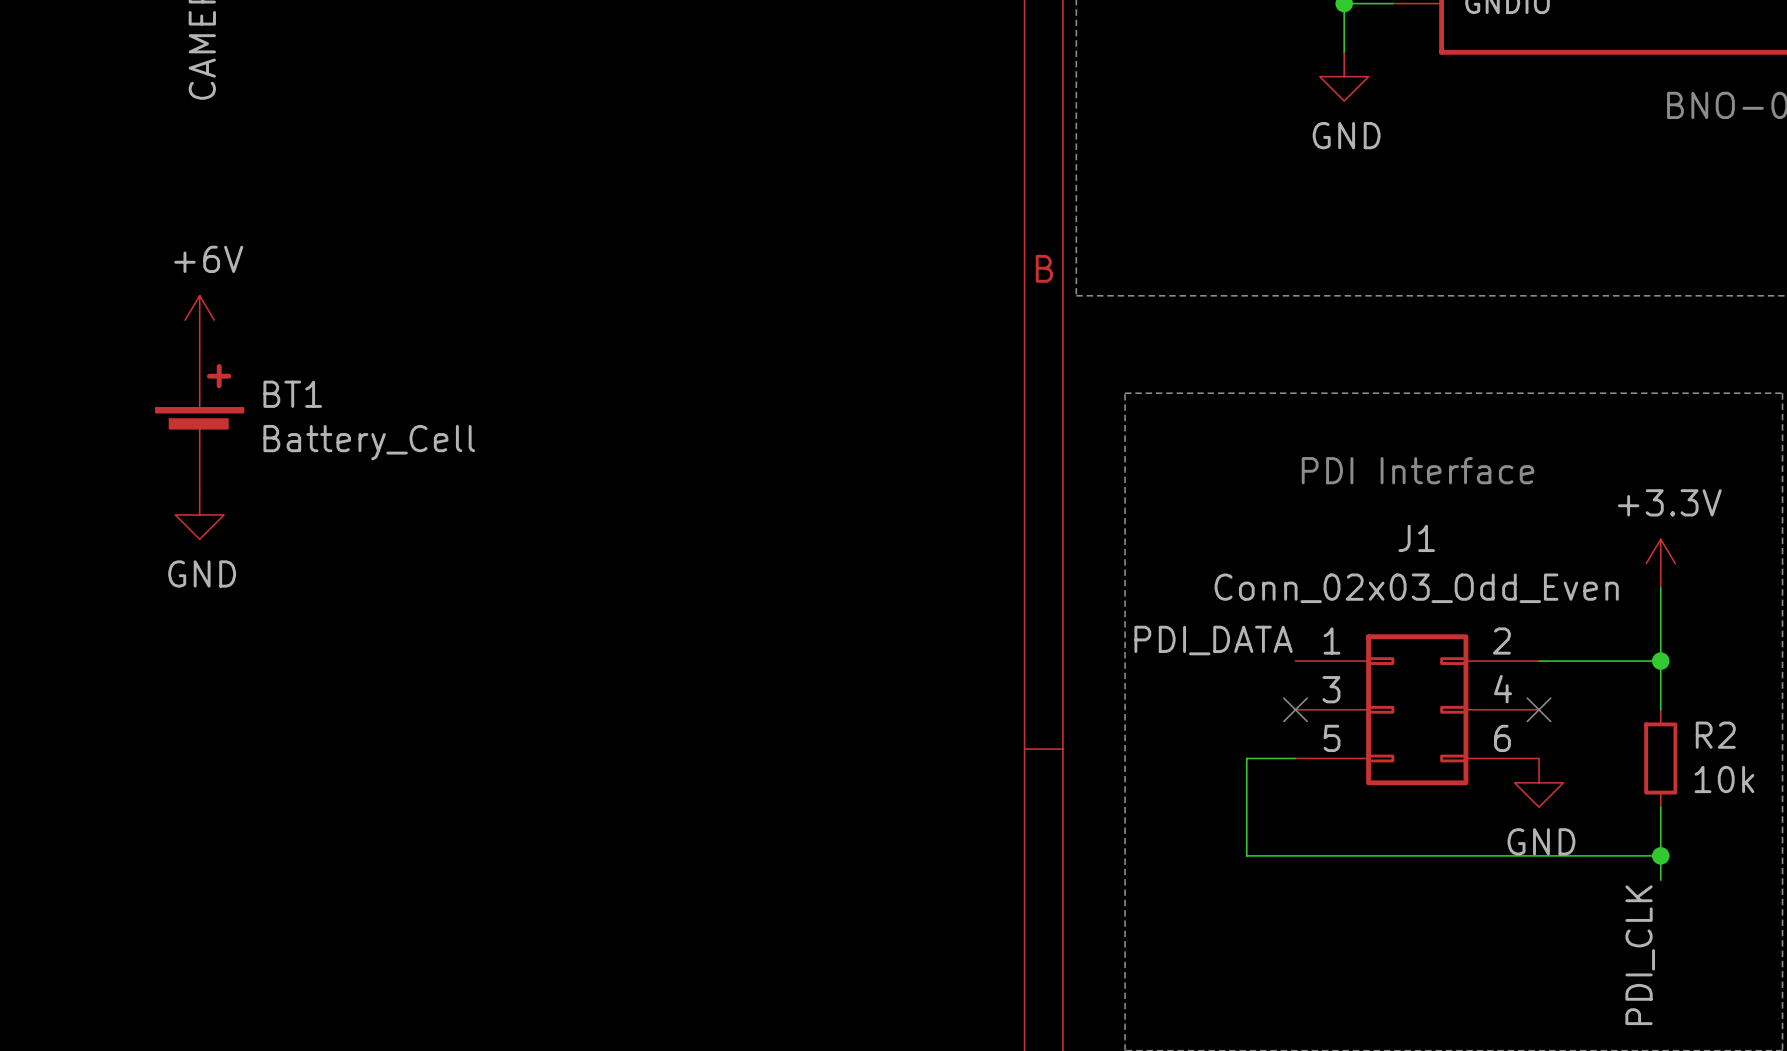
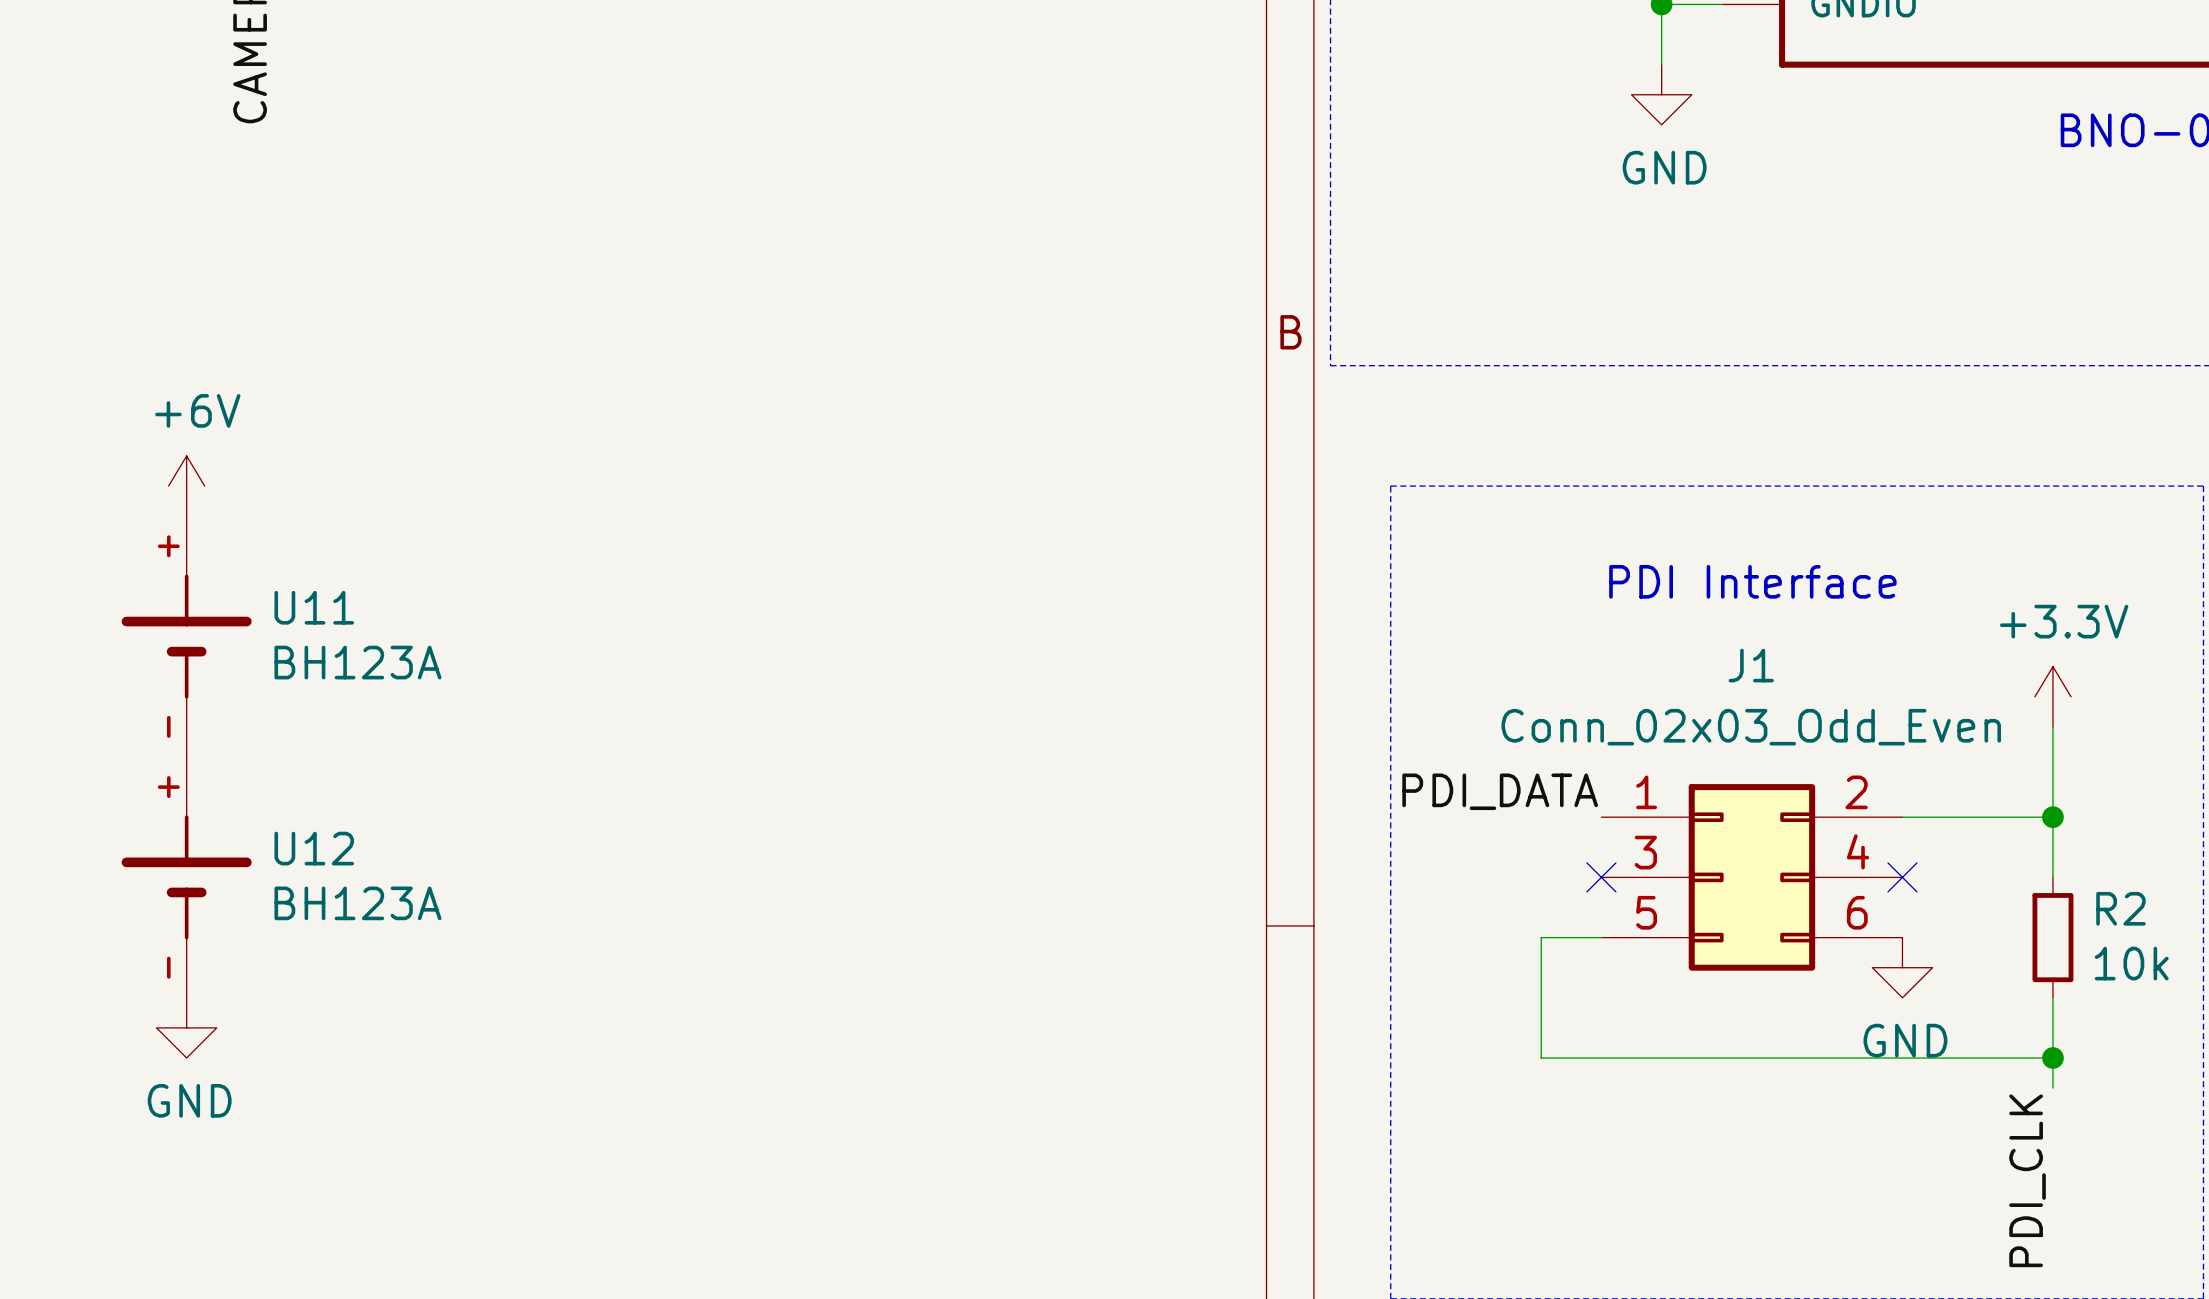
power symbol position: +6V (199, 320) -> +6V (186, 486)
BT1: Battery_Cell (199, 417) -> none
U11: none -> BH123A (186, 636)
power symbol position: GND (199, 514) -> GND (186, 1027)
U12: none -> BH123A (186, 877)

